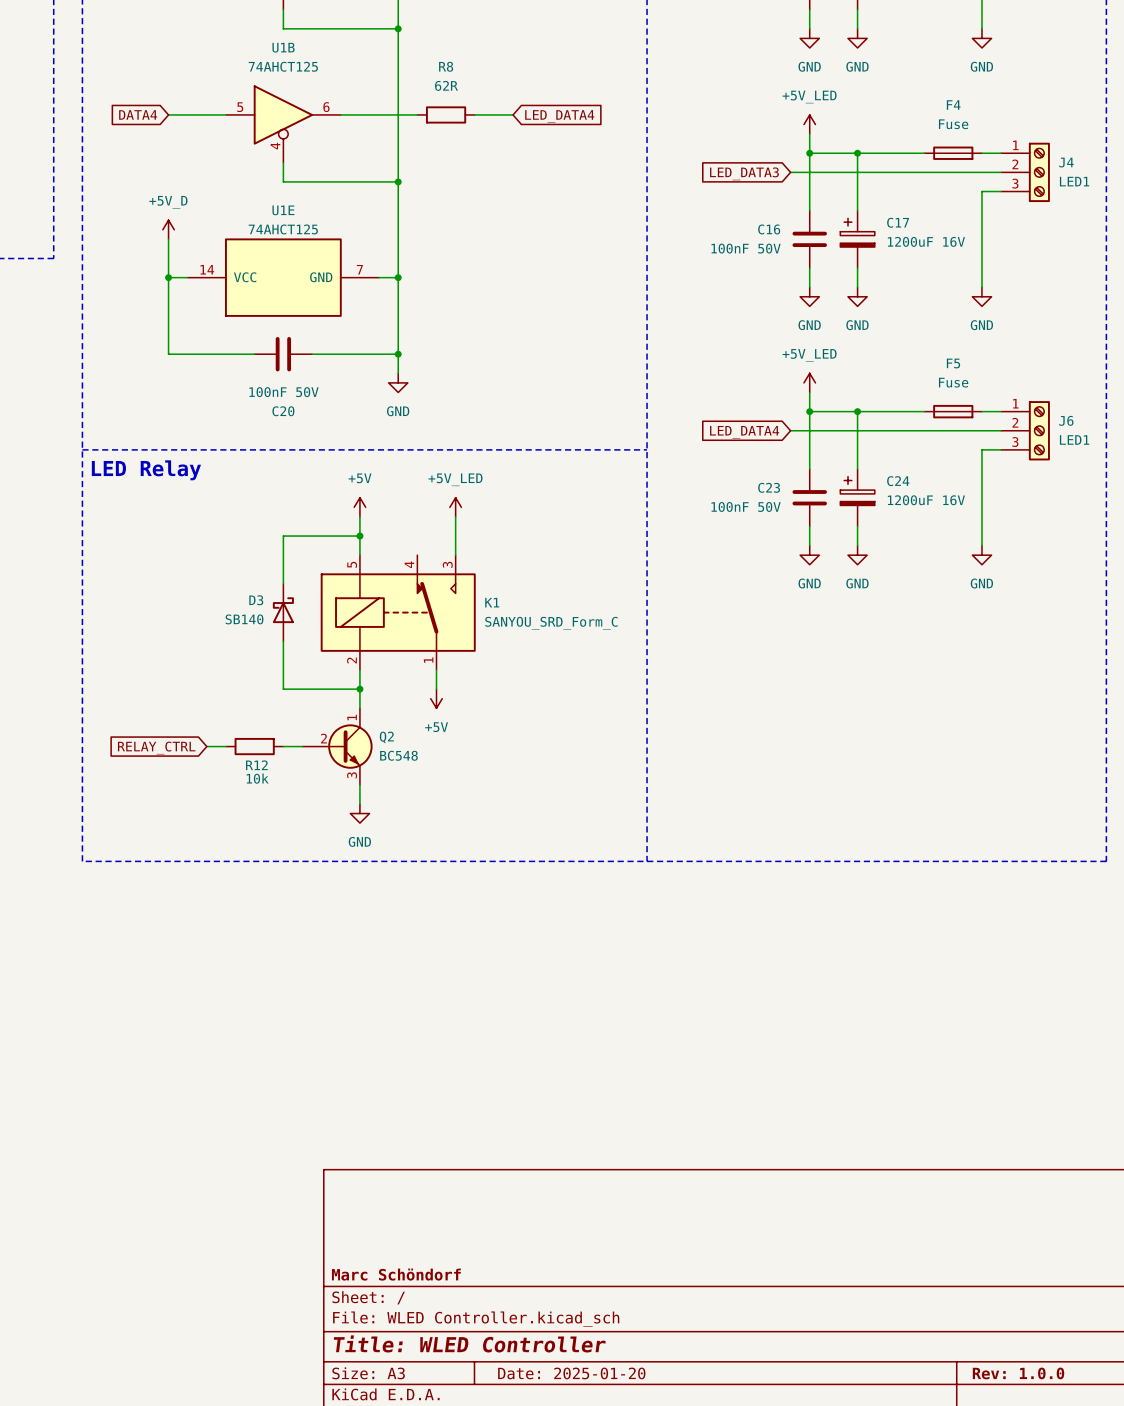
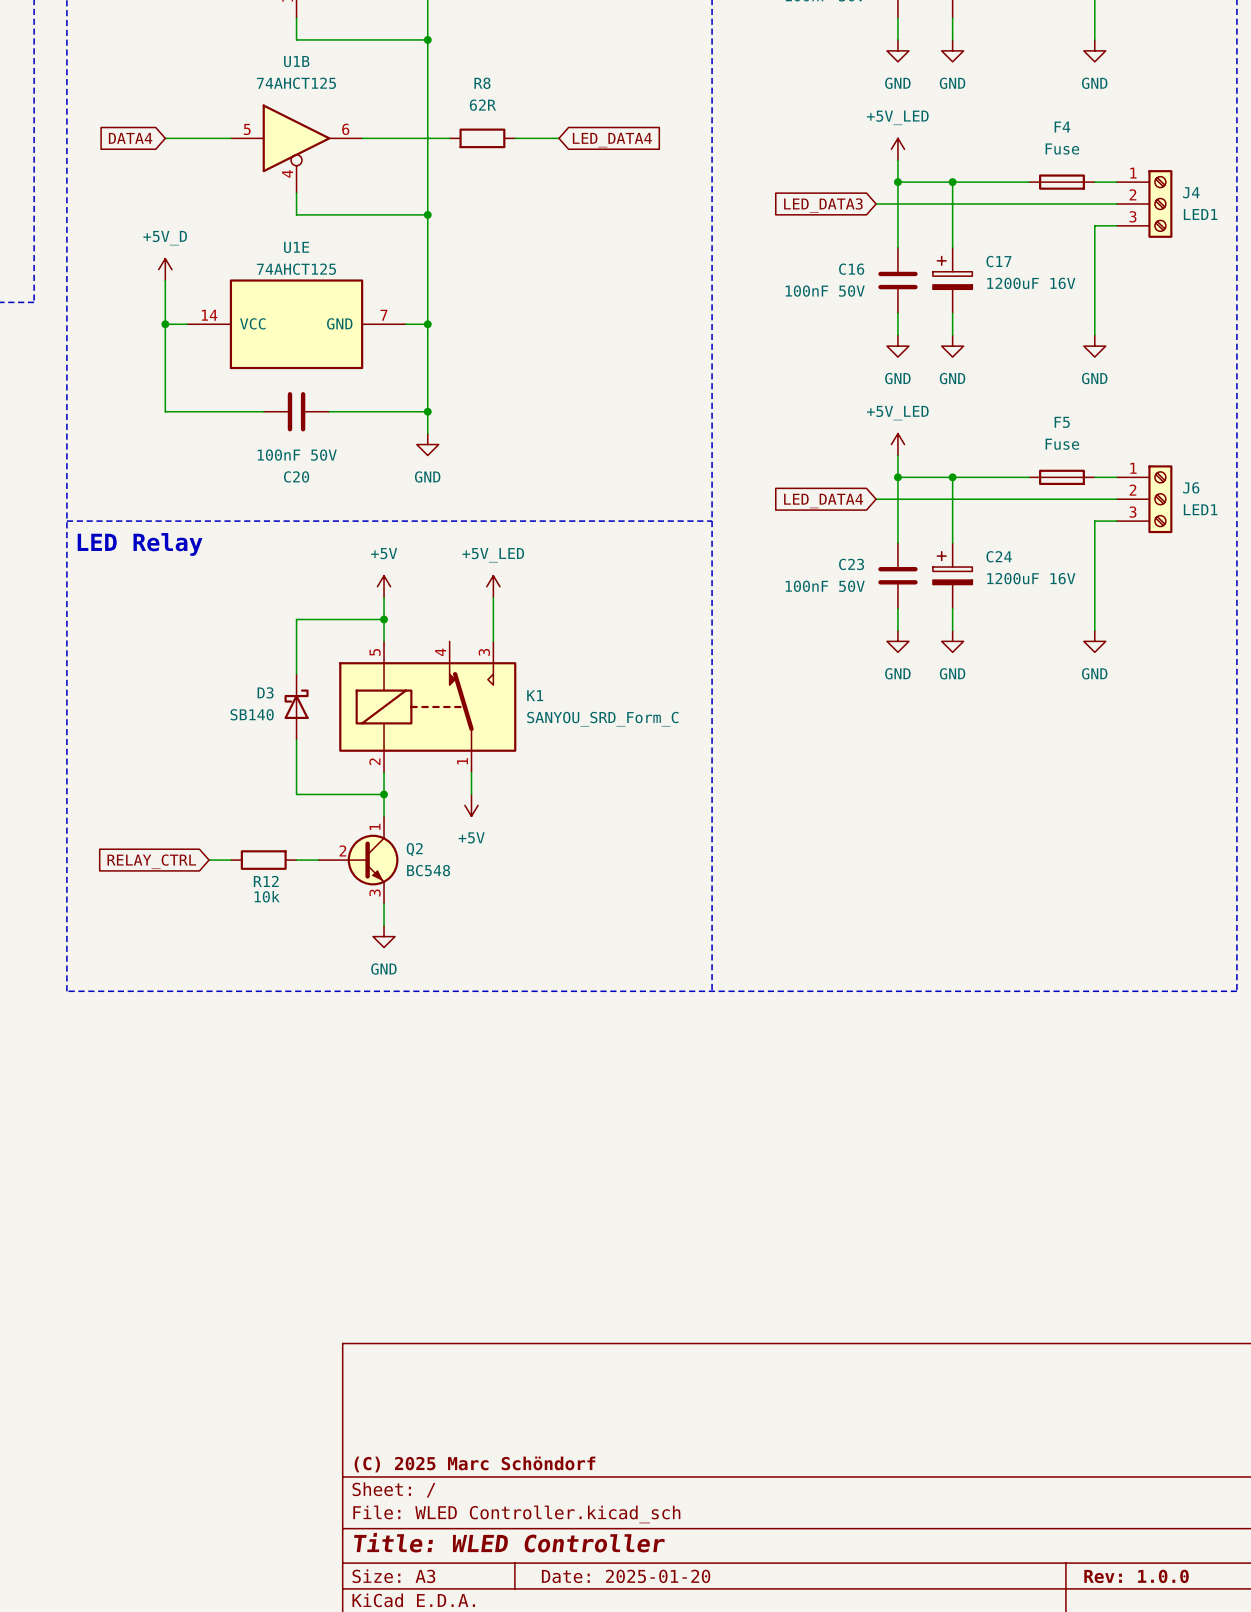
title block: Marc Schöndorf (396, 1274) -> (C) 2025 Marc Schöndorf (474, 1464)

